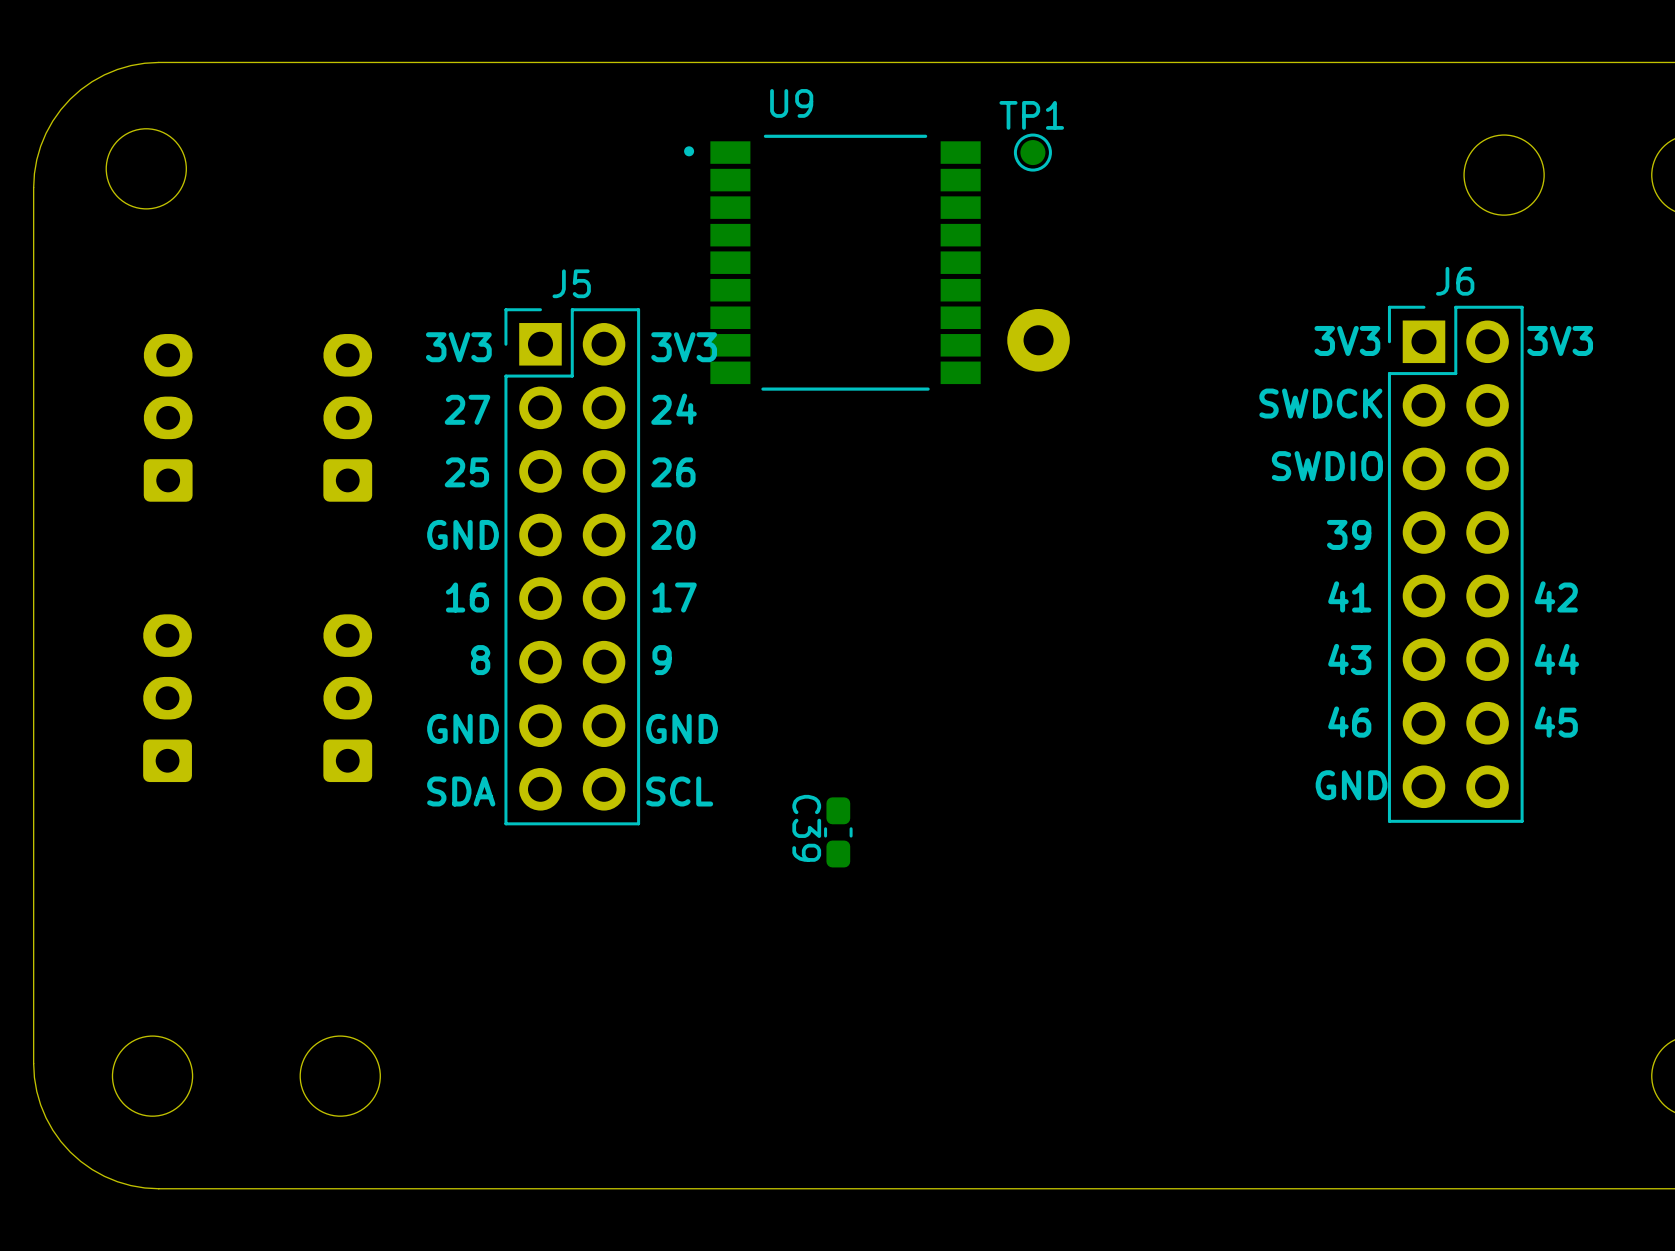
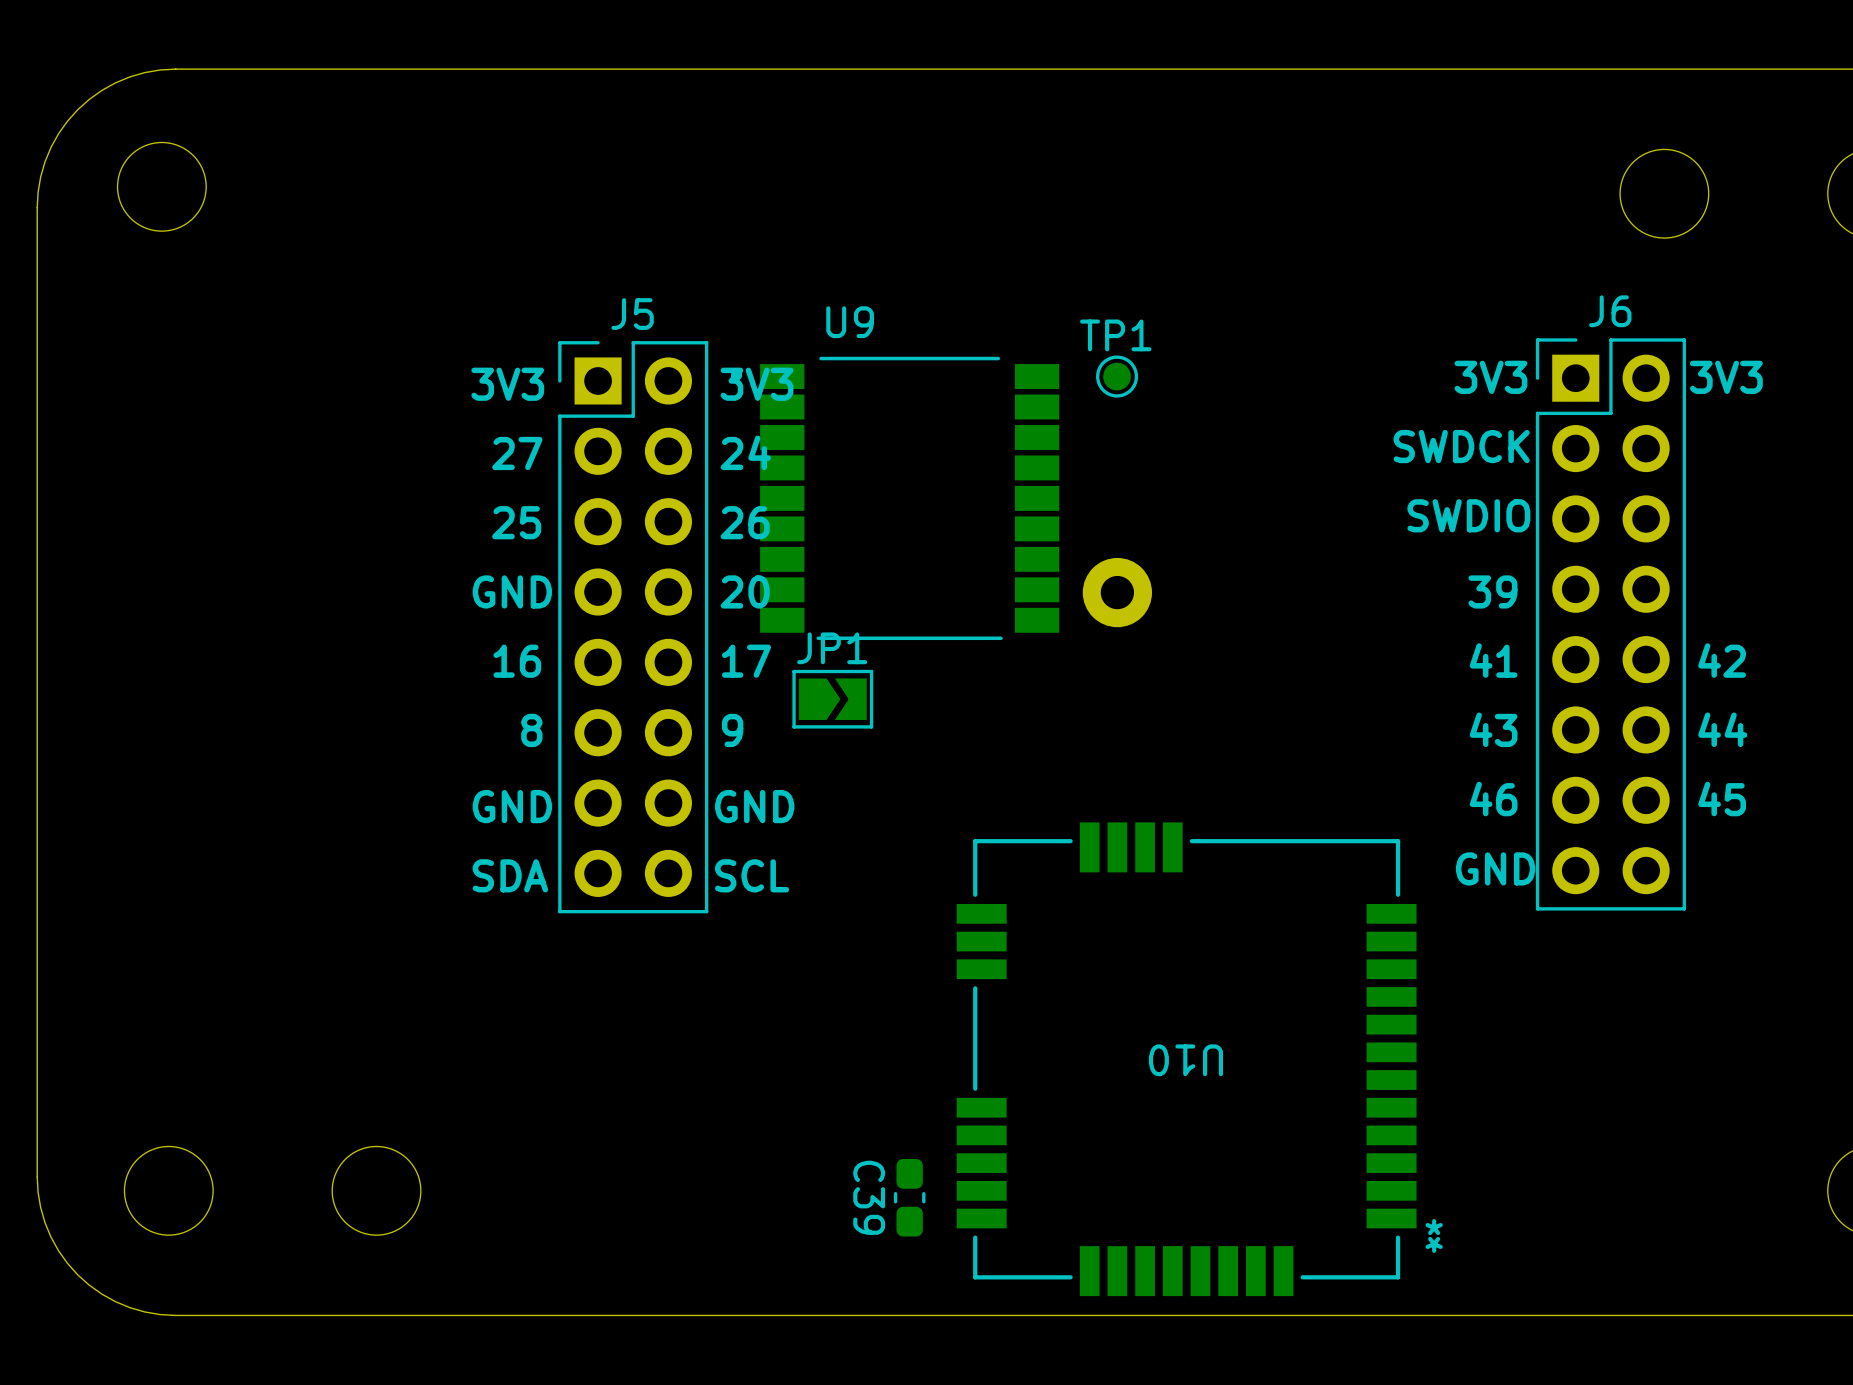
TP1 position: (1032, 152) -> (1117, 376)
U9 position: (832, 262) -> (895, 498)
part position: (1038, 340) -> (1117, 592)
part: (168, 417) -> none
part: (347, 417) -> none
JP1: none -> (832, 699)
part: (167, 698) -> none
part: (347, 698) -> none
C39 name position: C39 (806, 828) -> C39 (869, 1197)
C39 position: (838, 832) -> (909, 1197)
U10: none -> (1186, 1059)

